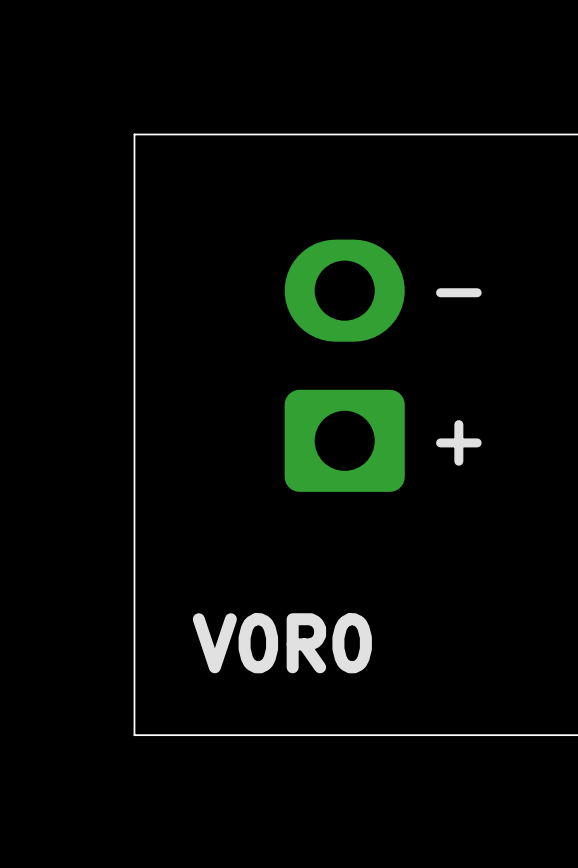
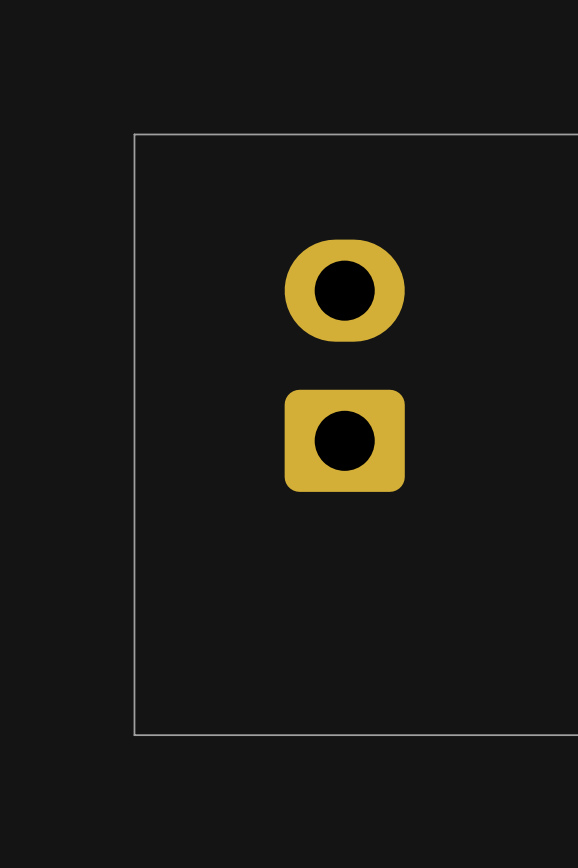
text: - (458, 292) -> none
text: + (458, 442) -> none
text: V0R0 (282, 643) -> none

